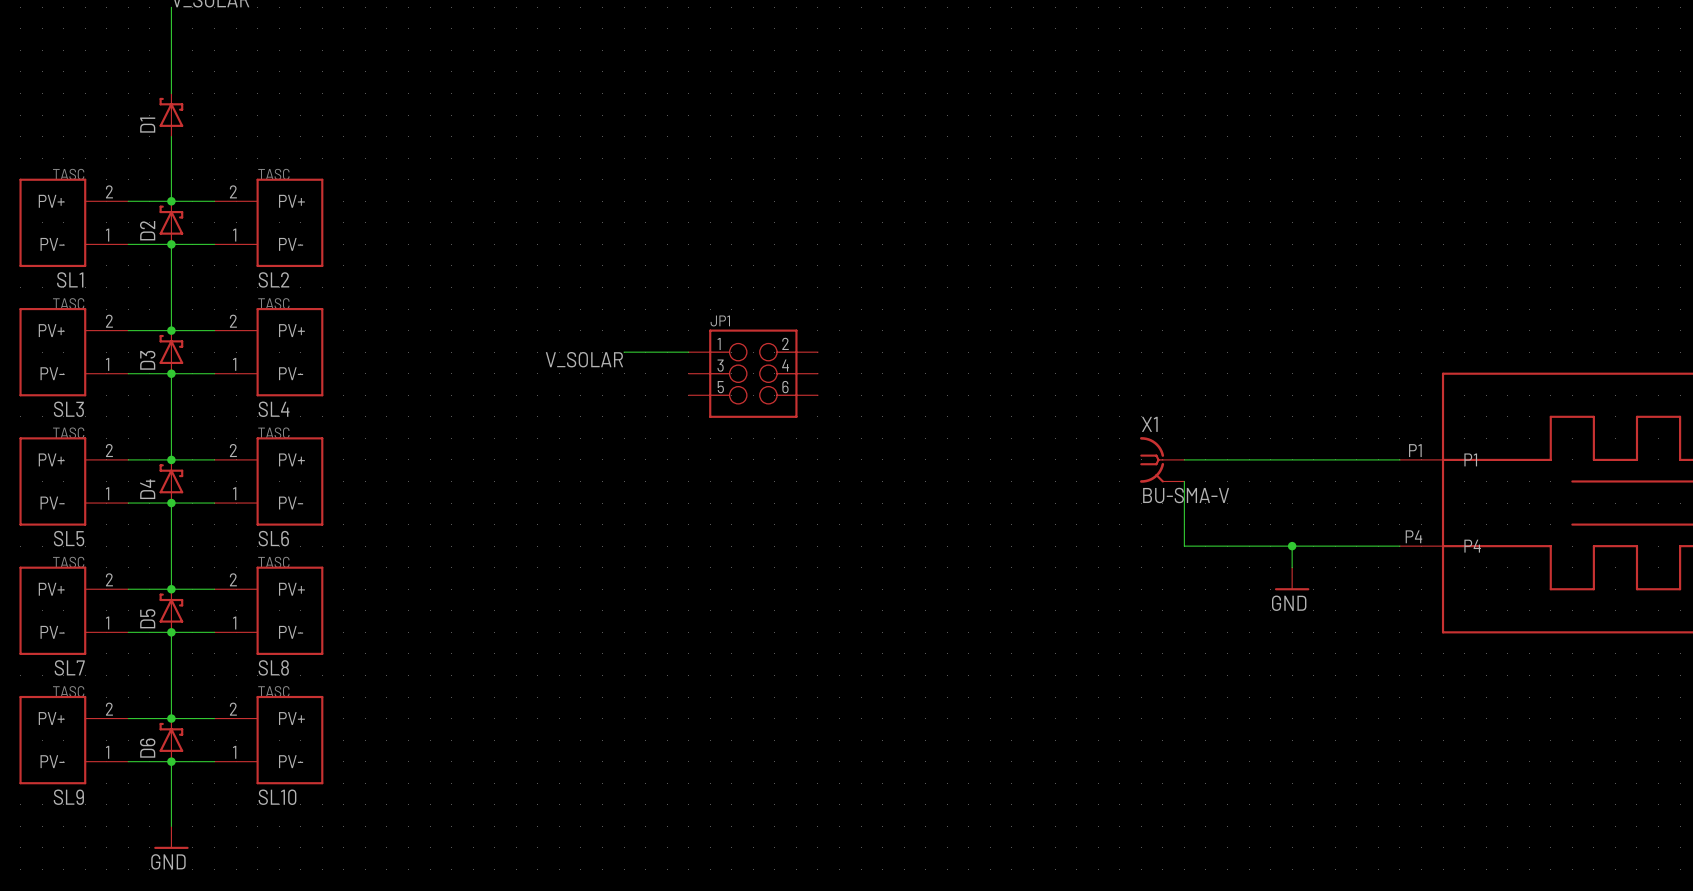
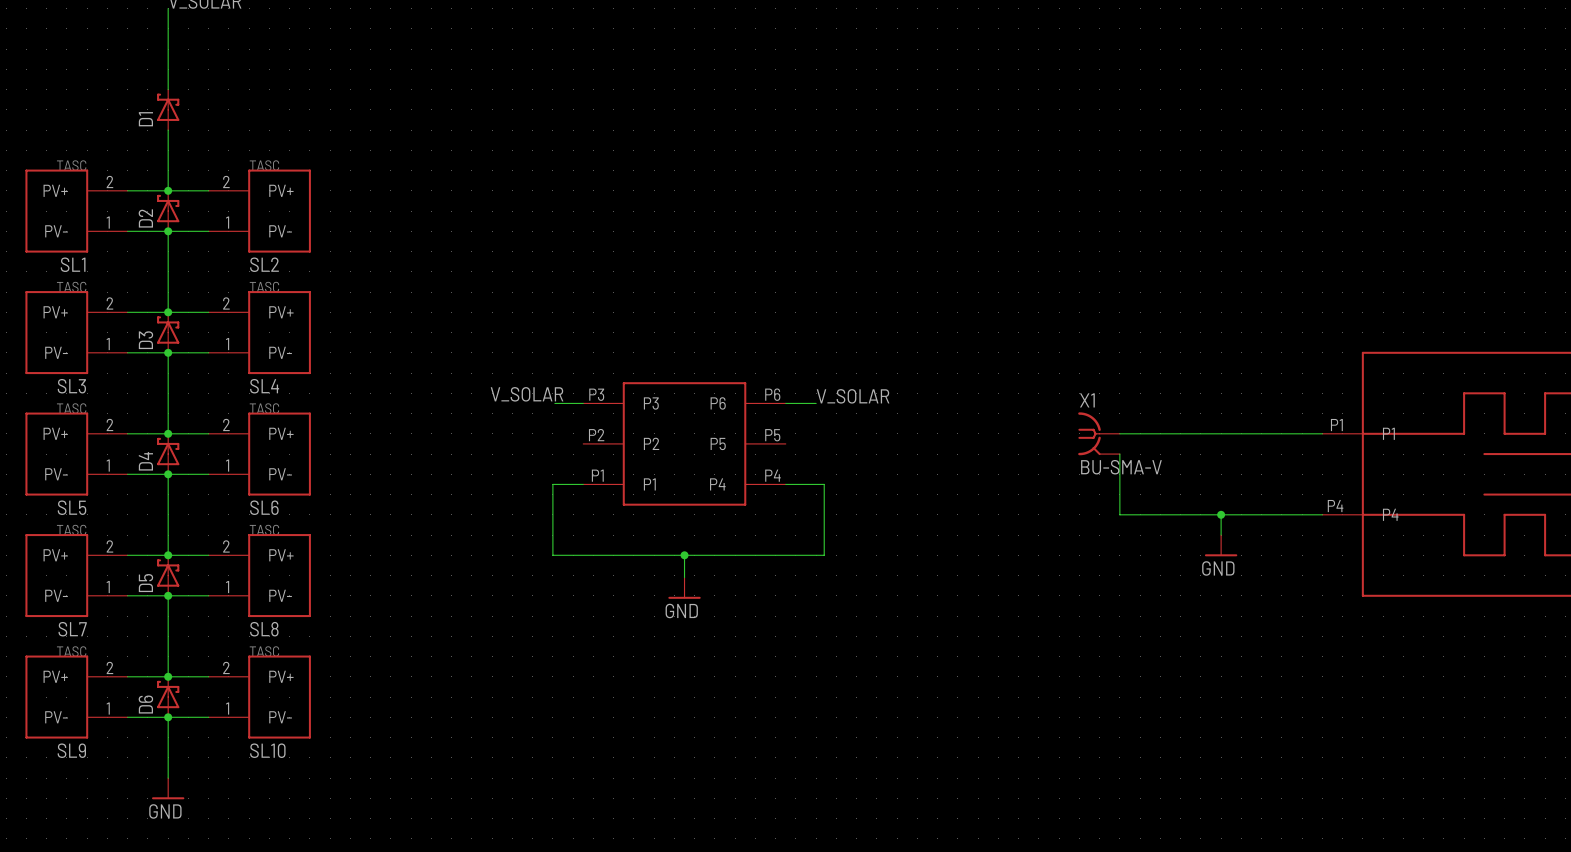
wire: (624, 352) (688, 352) -> none
label: V_SOLAR (584, 359) -> none
JP1: (753, 373) -> none
label: none -> V_SOLAR (527, 394)
label: none -> V_SOLAR (853, 396)
wire: none -> (554, 403) (583, 403)
wire: none -> (785, 403) (816, 403)
part: none -> (684, 443)
wire: none -> (583, 484) (552, 484) (552, 555) (824, 555) (824, 484) (785, 484)
wire: none -> (684, 555) (684, 577)
junction: none -> (684, 555)
power symbol: none -> GND (684, 588)

